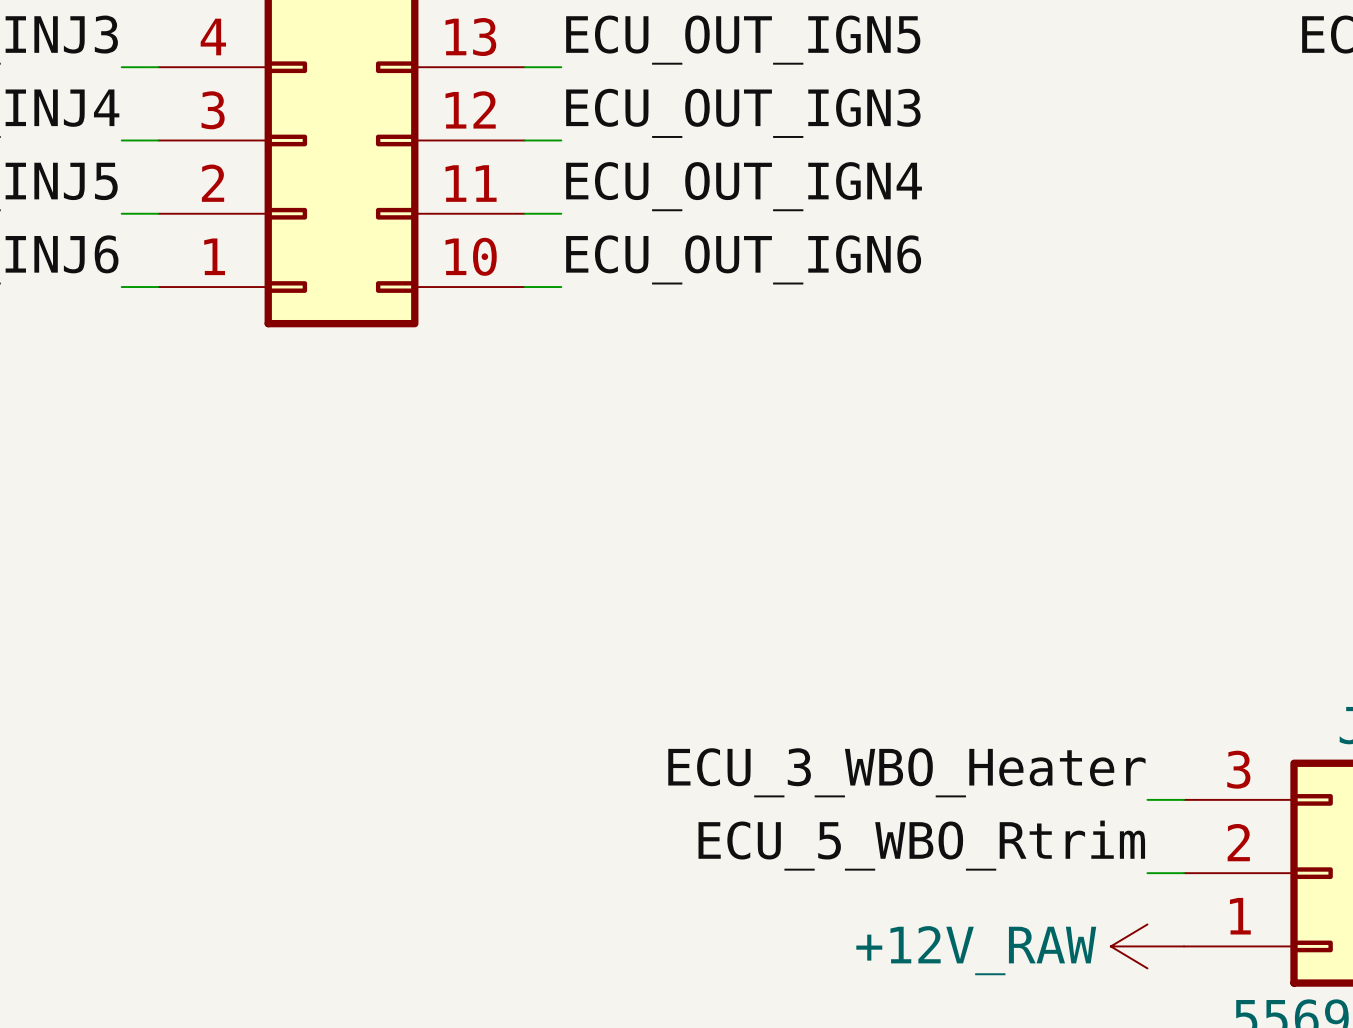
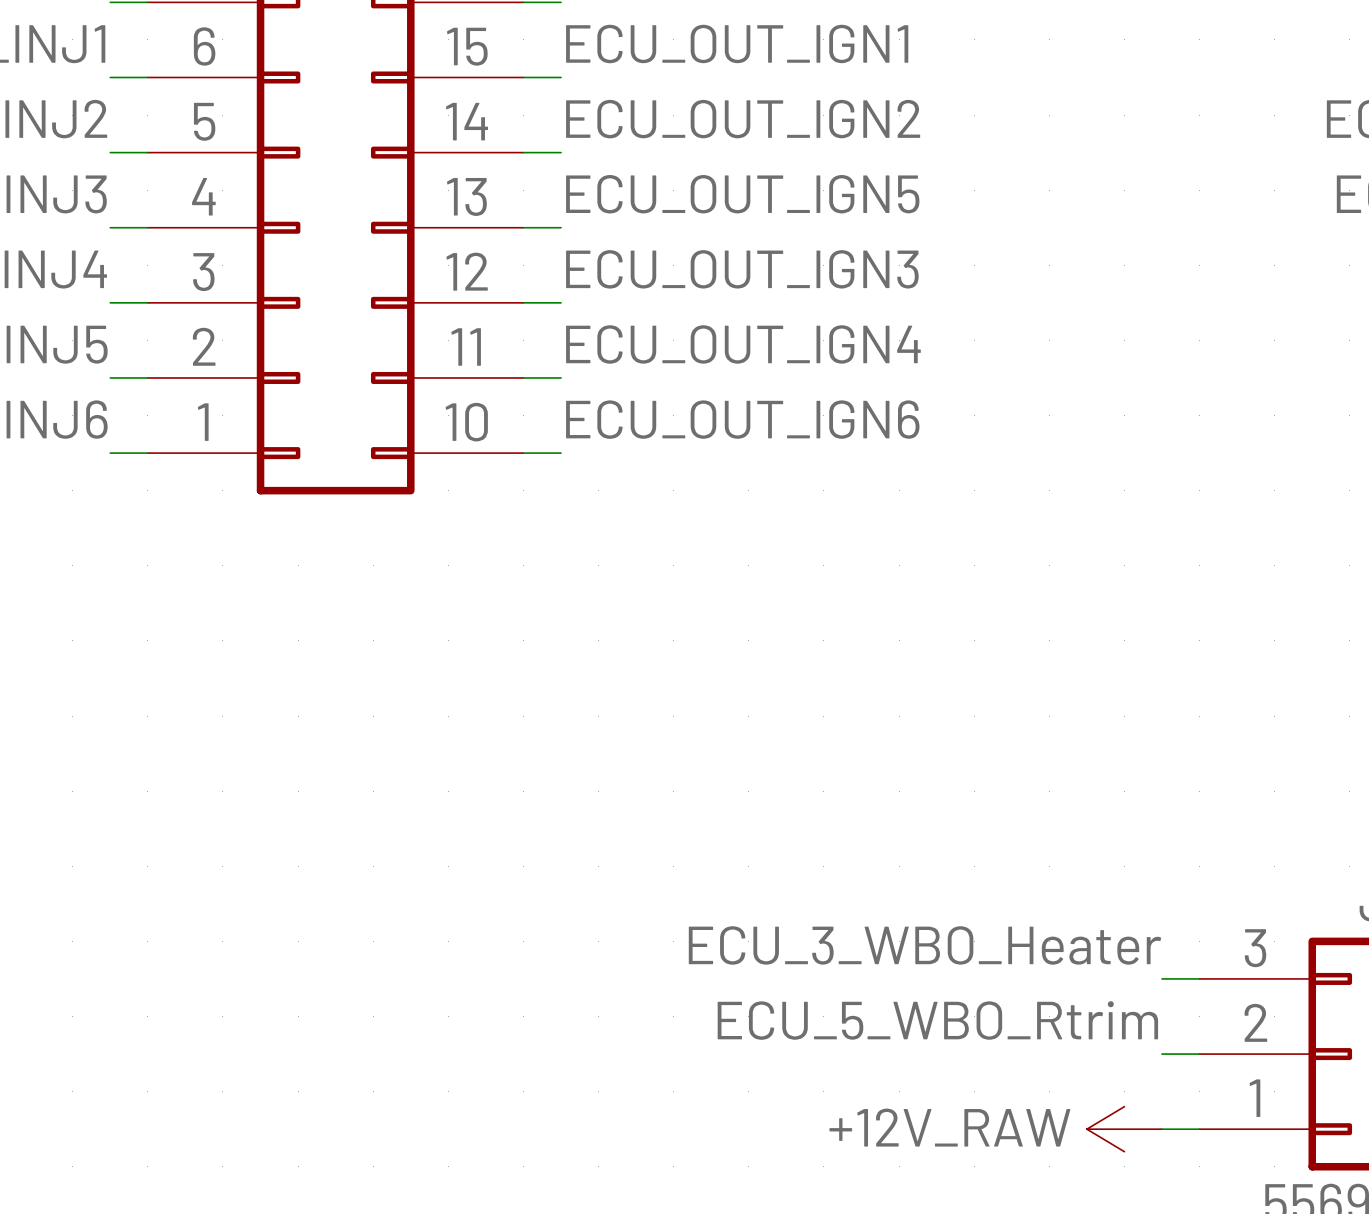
power symbol position: +12V_RAW (1147, 946) -> +12V_RAW (1124, 1129)

